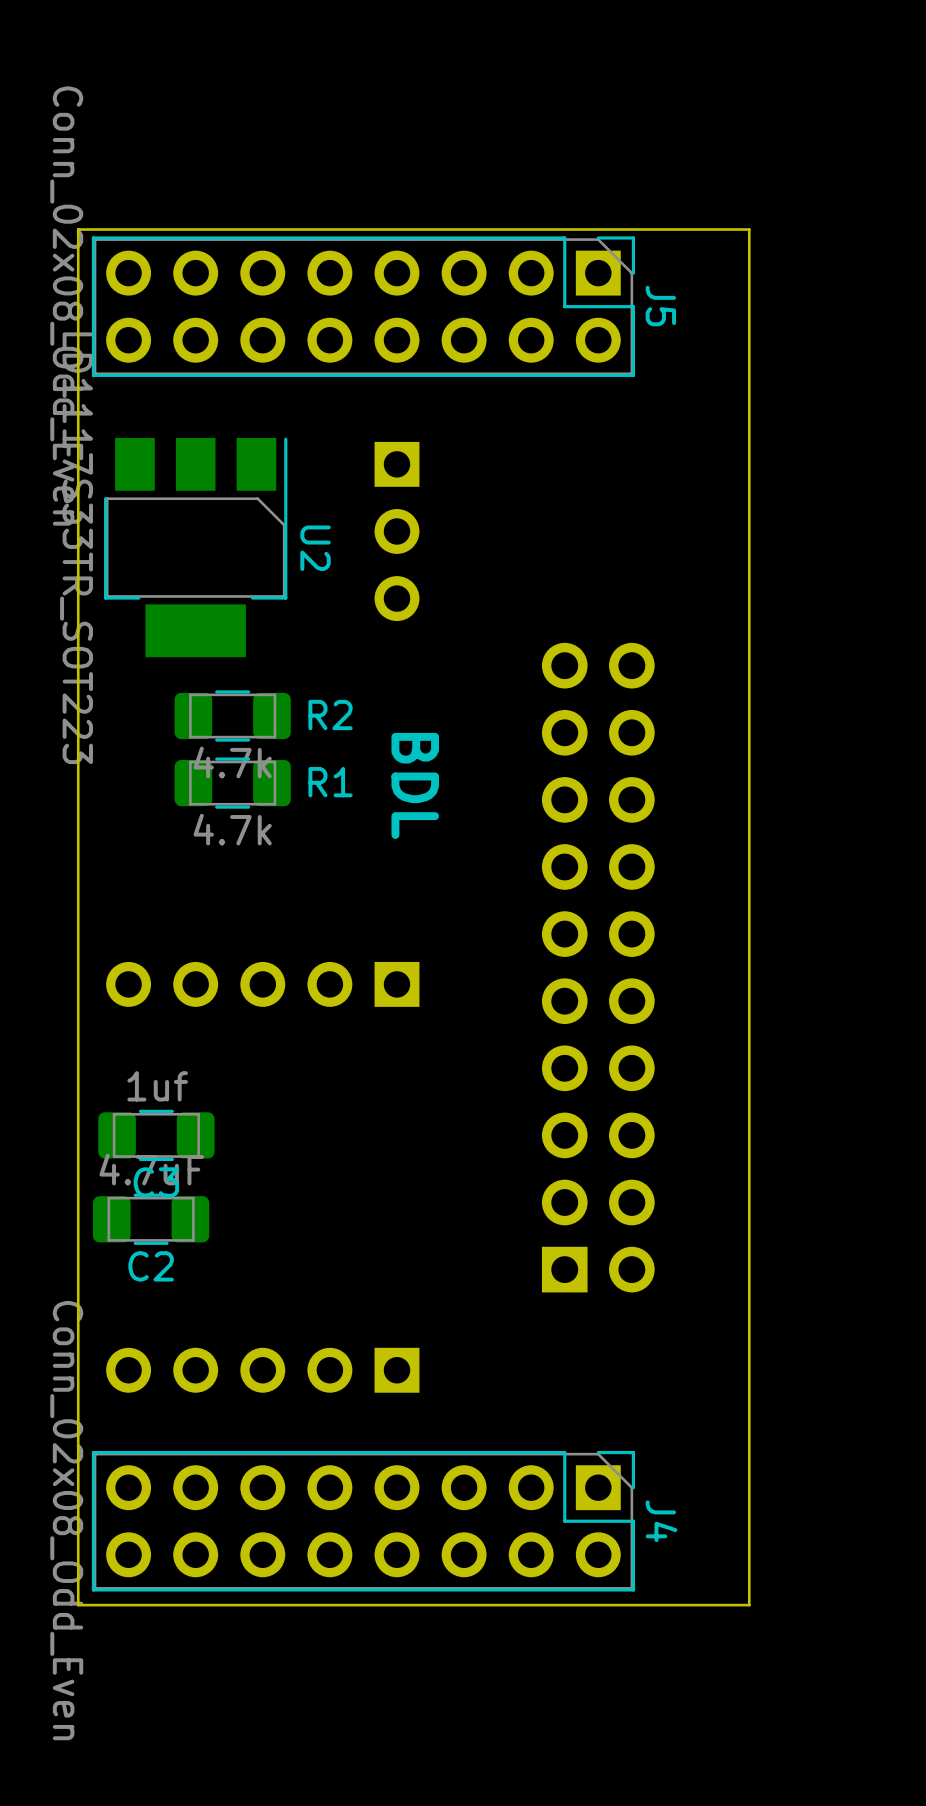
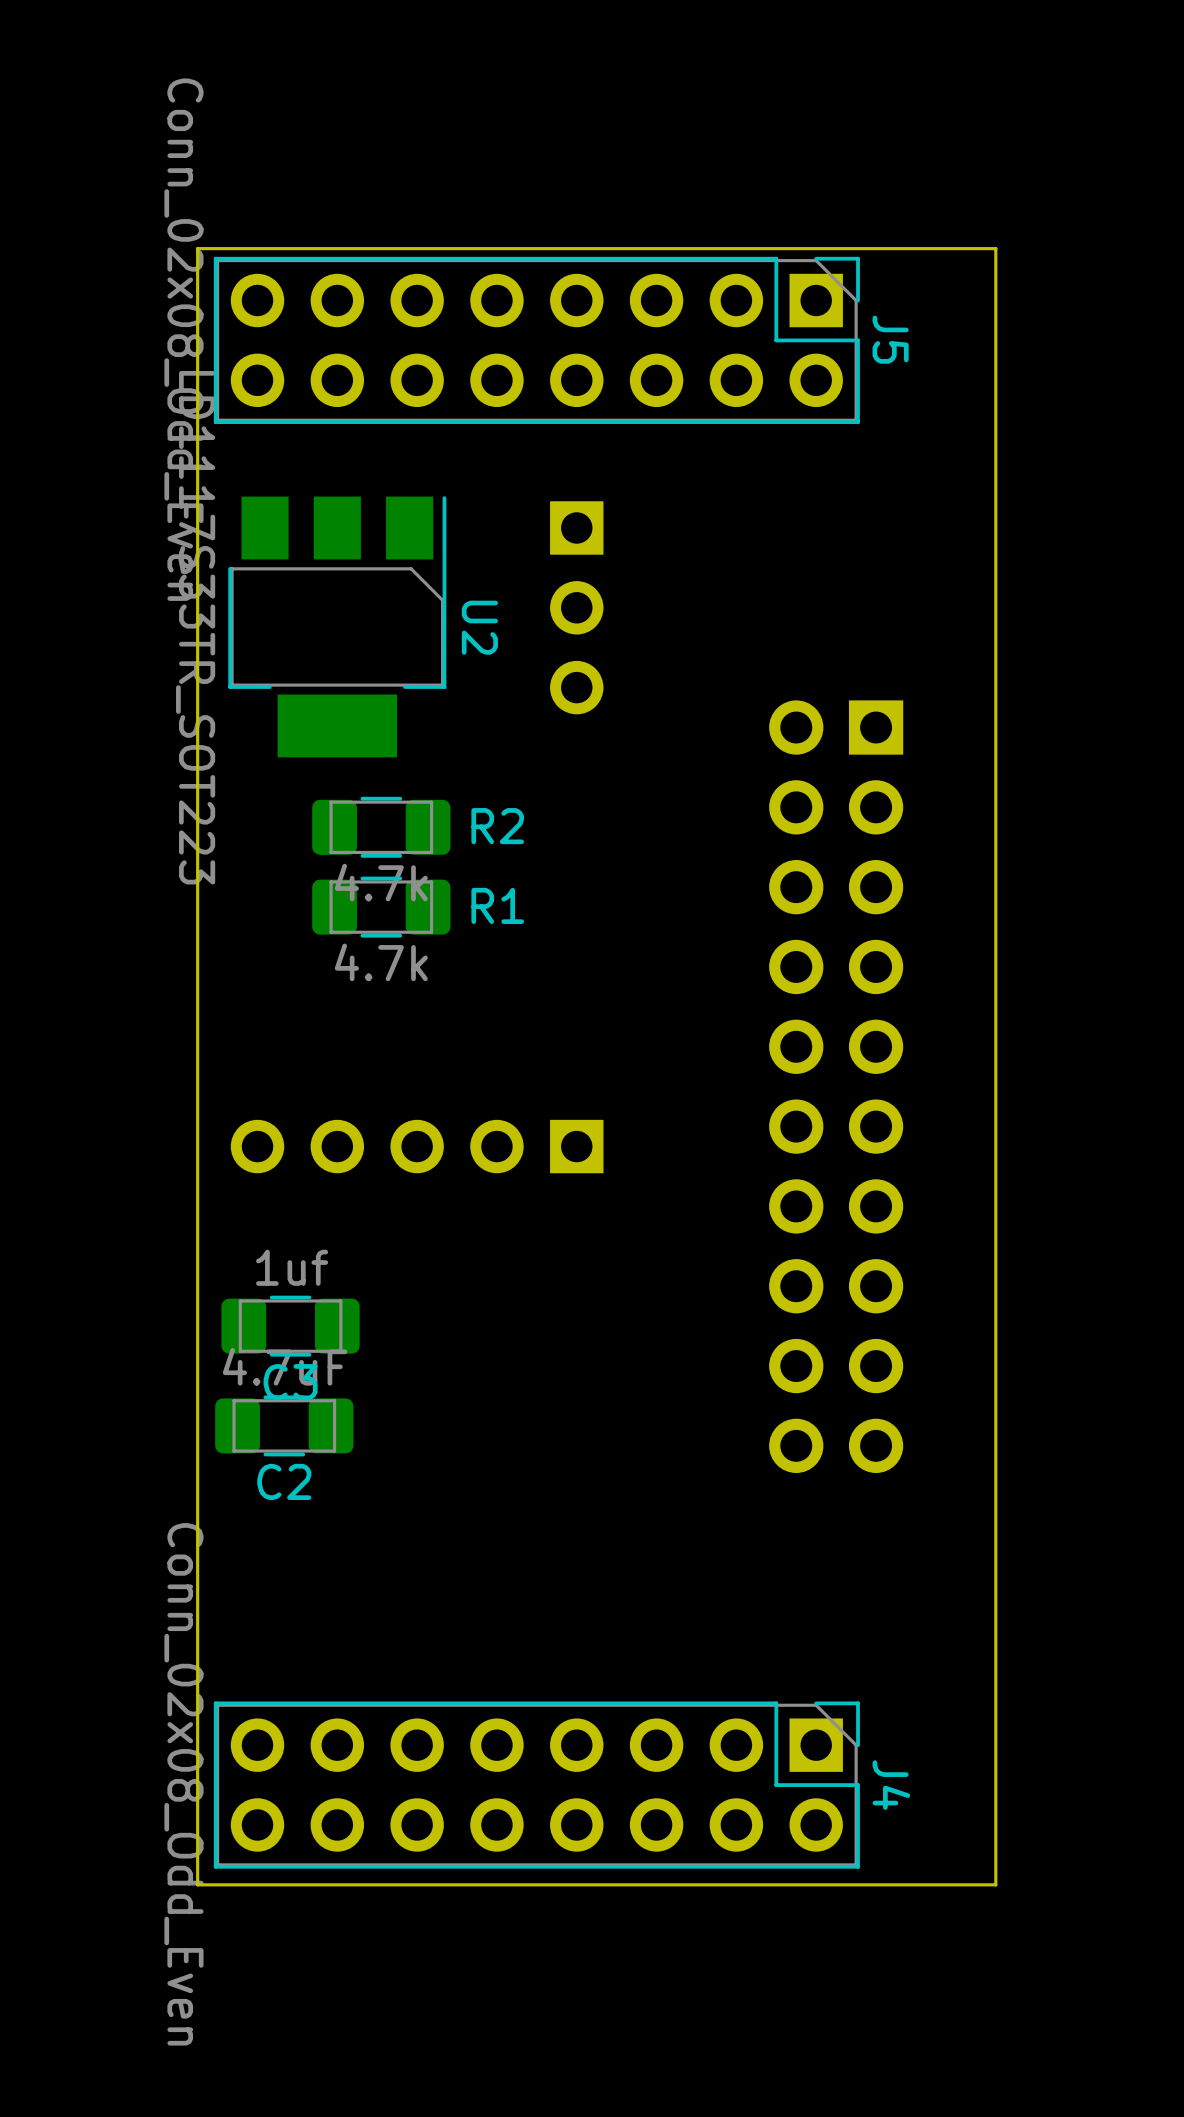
text: BDL (415, 785) -> none
part rotation: 0° (598, 967) -> 180° (836, 1086)
part: (262, 1370) -> none

